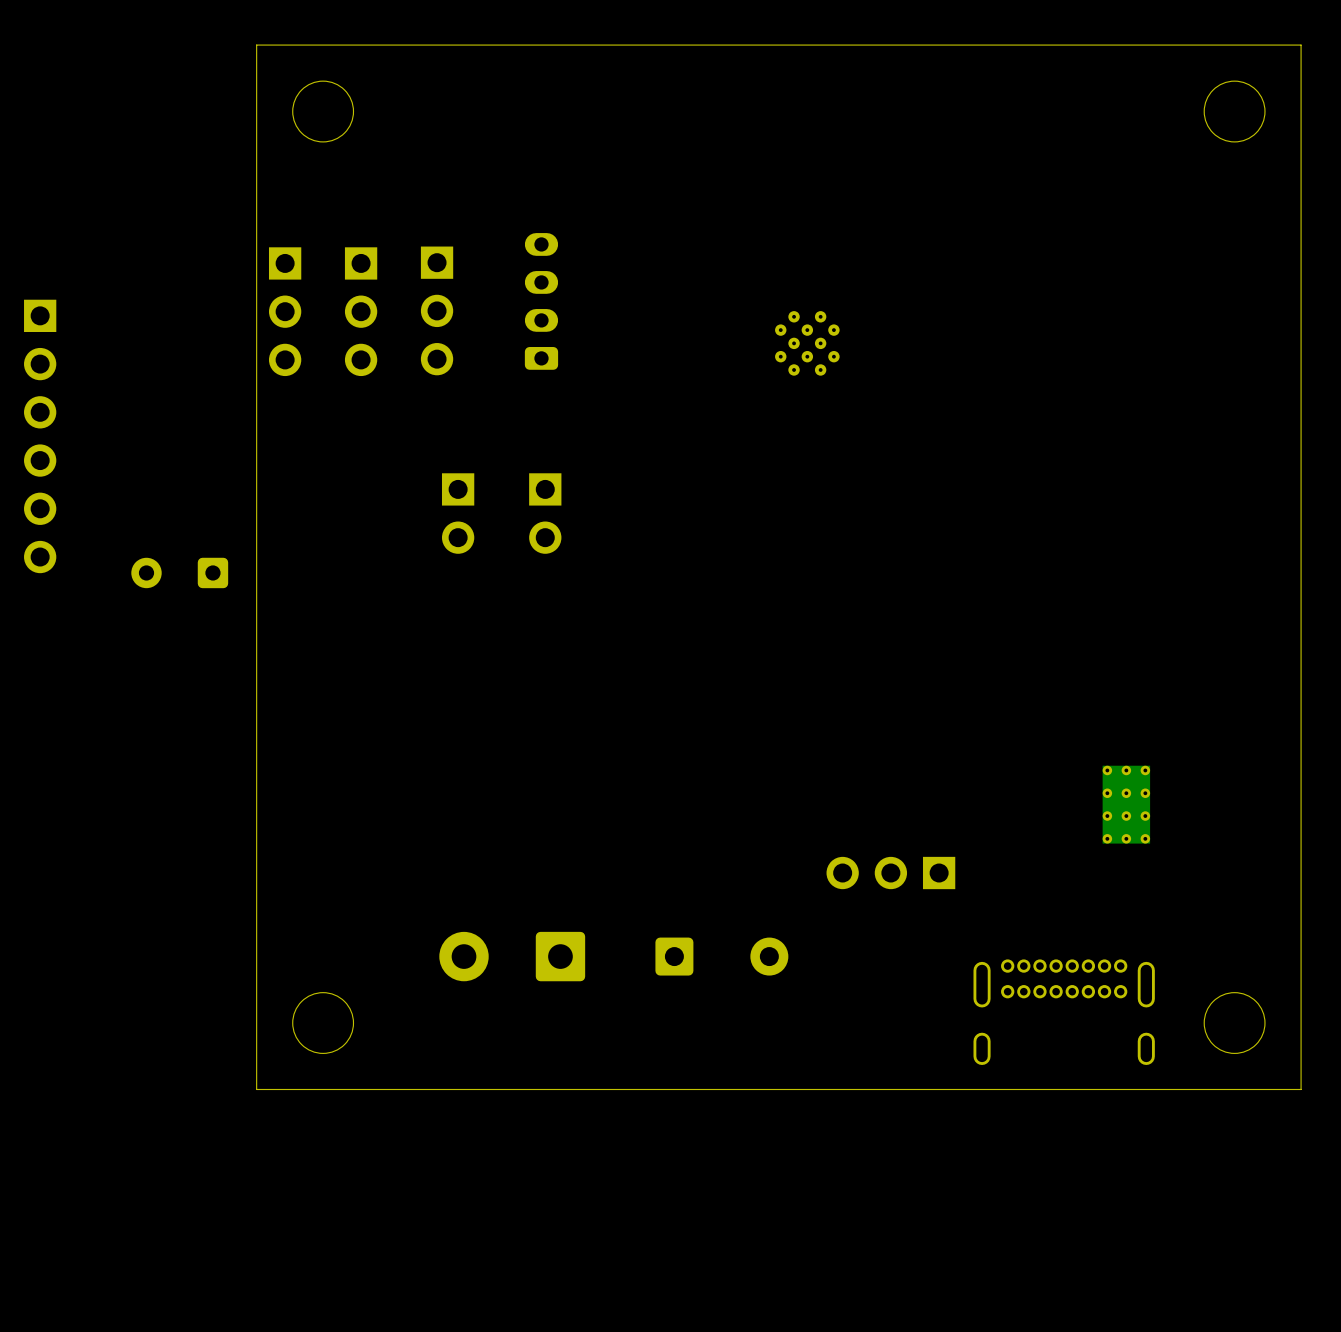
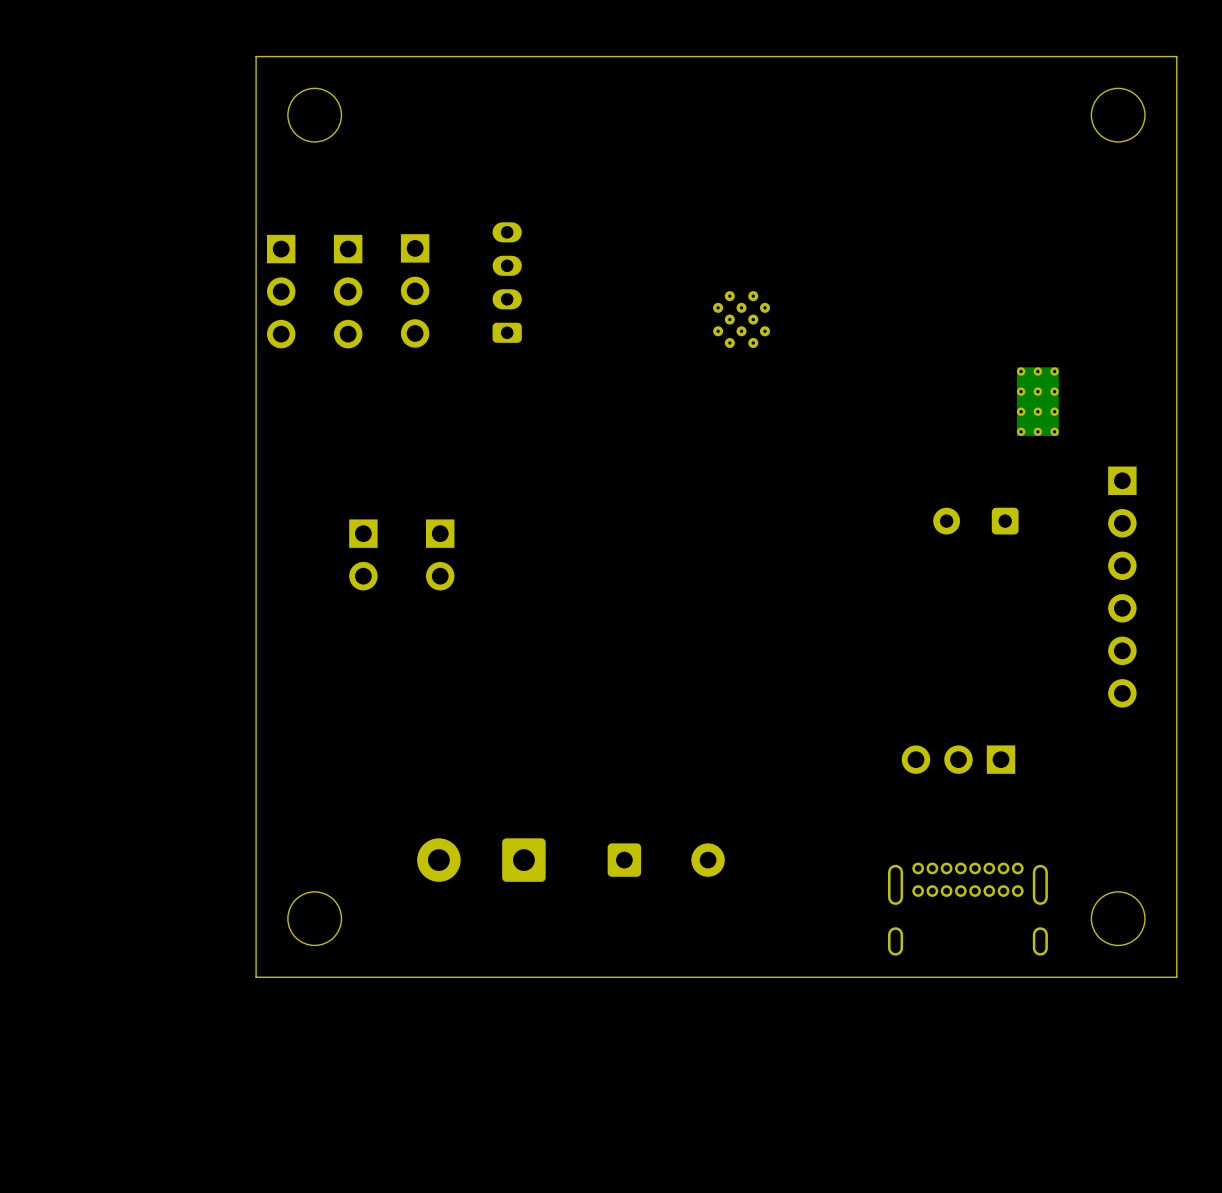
part: (40, 436) -> none
part: (458, 513) -> none
part: (545, 513) -> none
part: (179, 572) -> none
part: none -> (975, 521)
part: none -> (363, 554)
part: none -> (440, 554)
part: none -> (1122, 587)
part position: (1126, 804) -> (1037, 401)
part position: (890, 873) -> (958, 759)

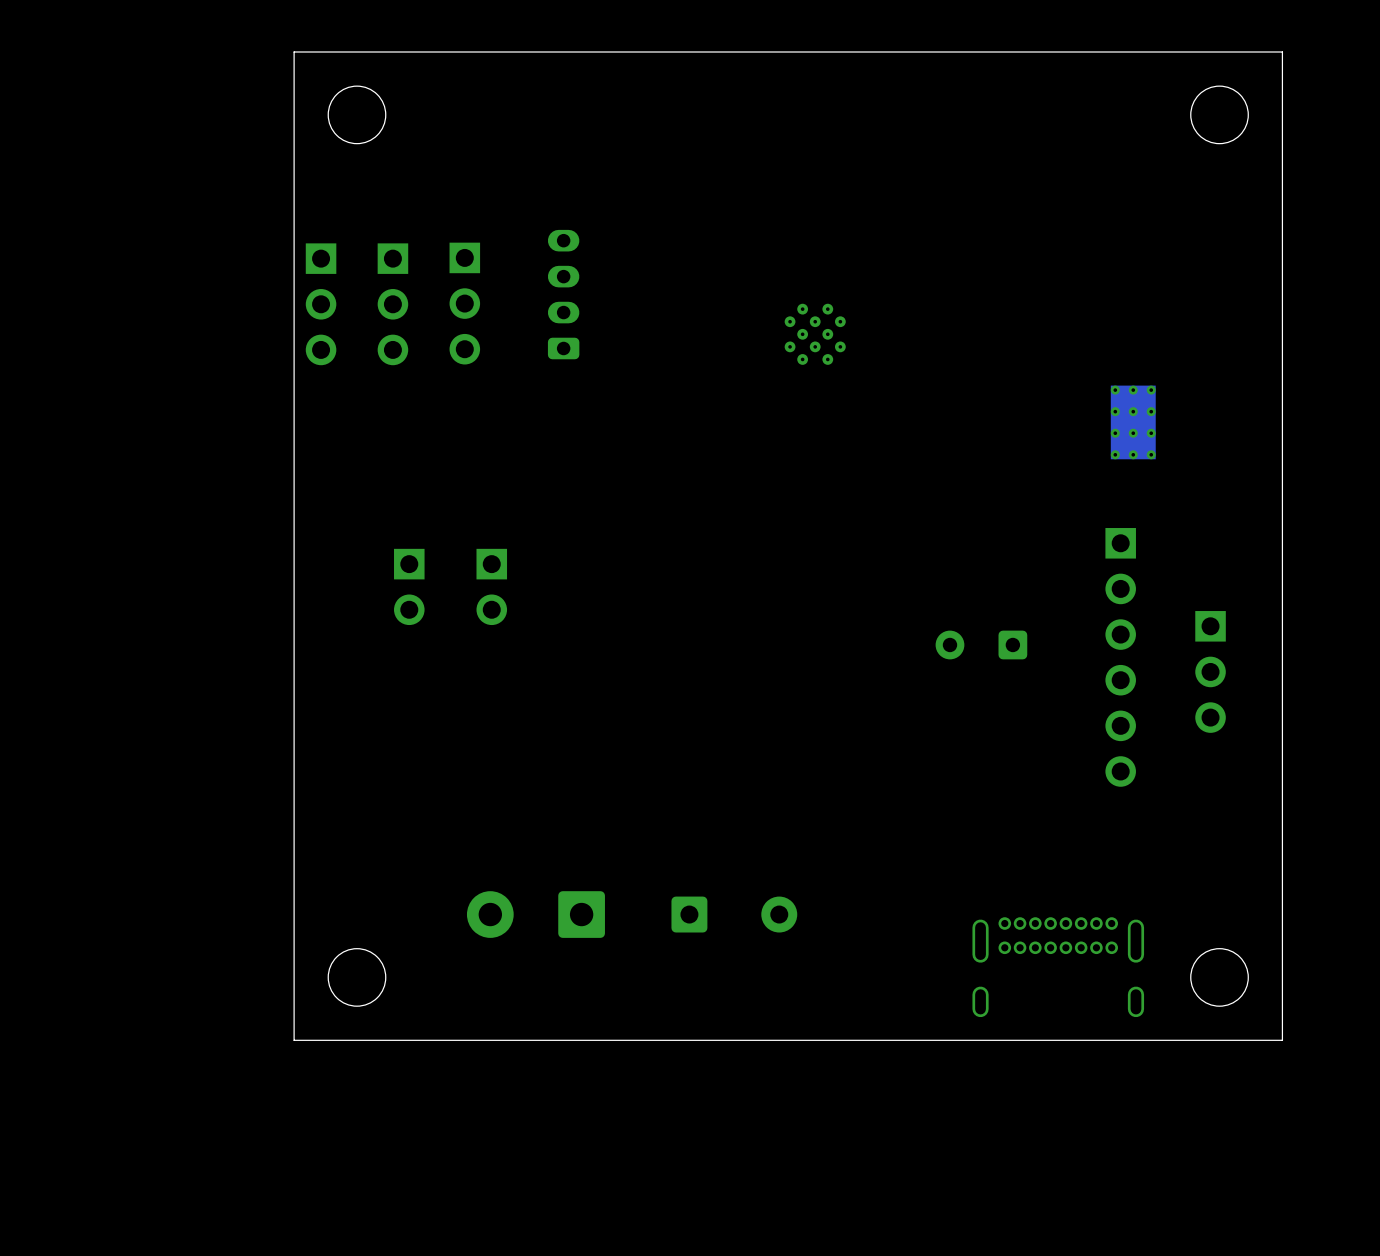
part position: (975, 521) -> (981, 644)
part position: (1122, 587) -> (1120, 657)
part rotation: 0° (958, 759) -> 90° counterclockwise (1210, 671)
part position: (958, 759) -> (1210, 671)

